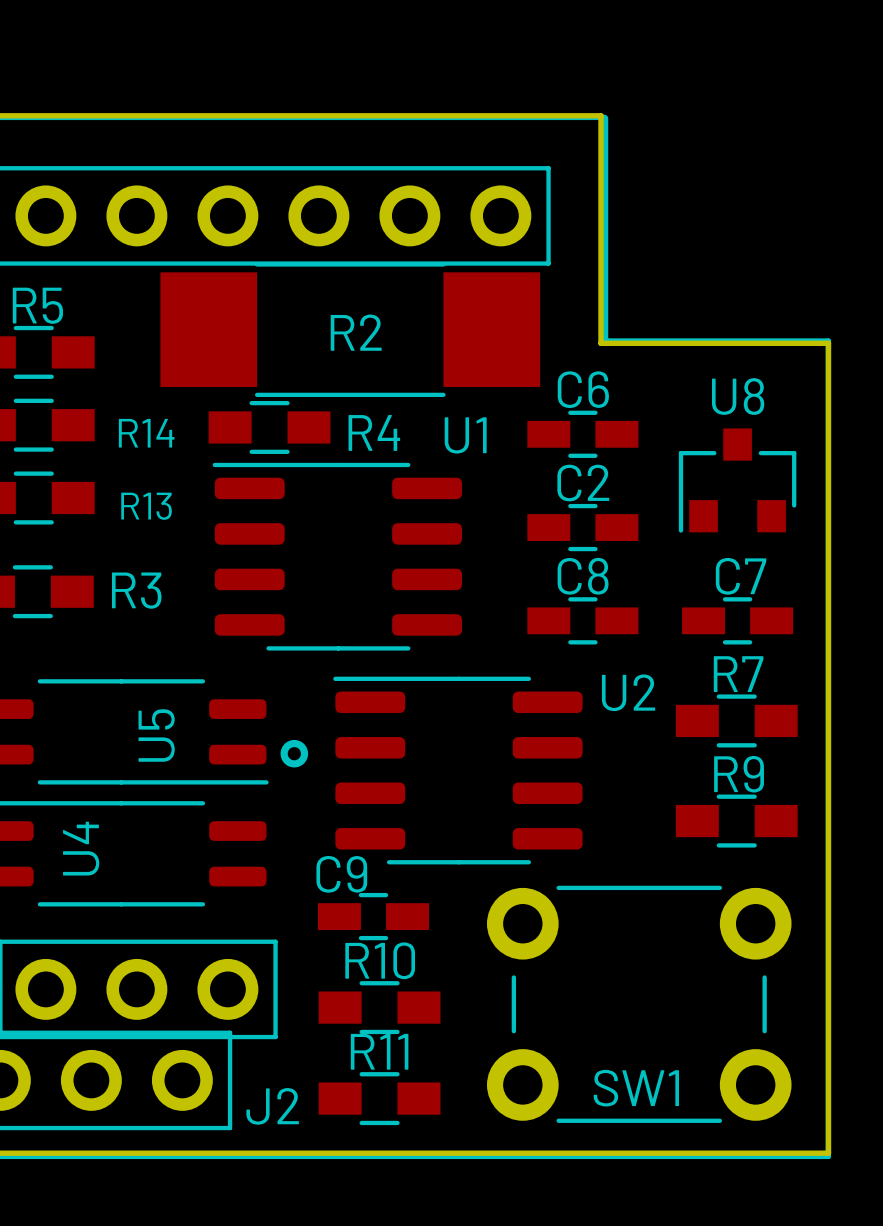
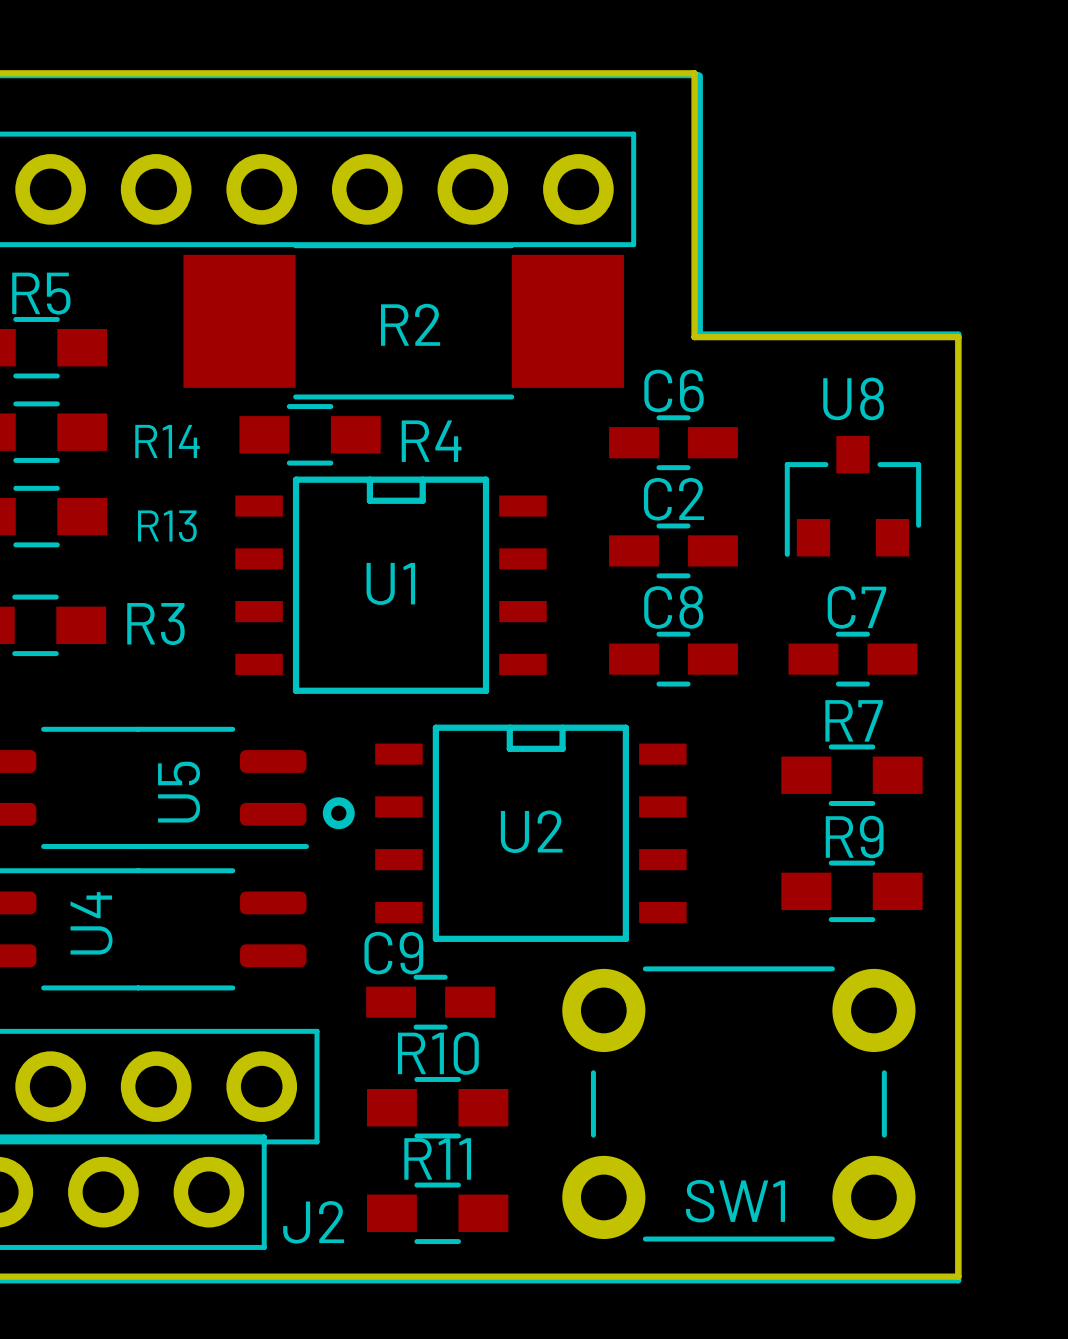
U1 name position: U1 (465, 435) -> U1 (390, 583)
U1 footprint: [212, 462, 463, 651] -> [235, 476, 547, 694]
U2 footprint: [333, 676, 583, 865] -> [375, 724, 687, 942]
U2 name position: U2 (628, 692) -> U2 (531, 831)

